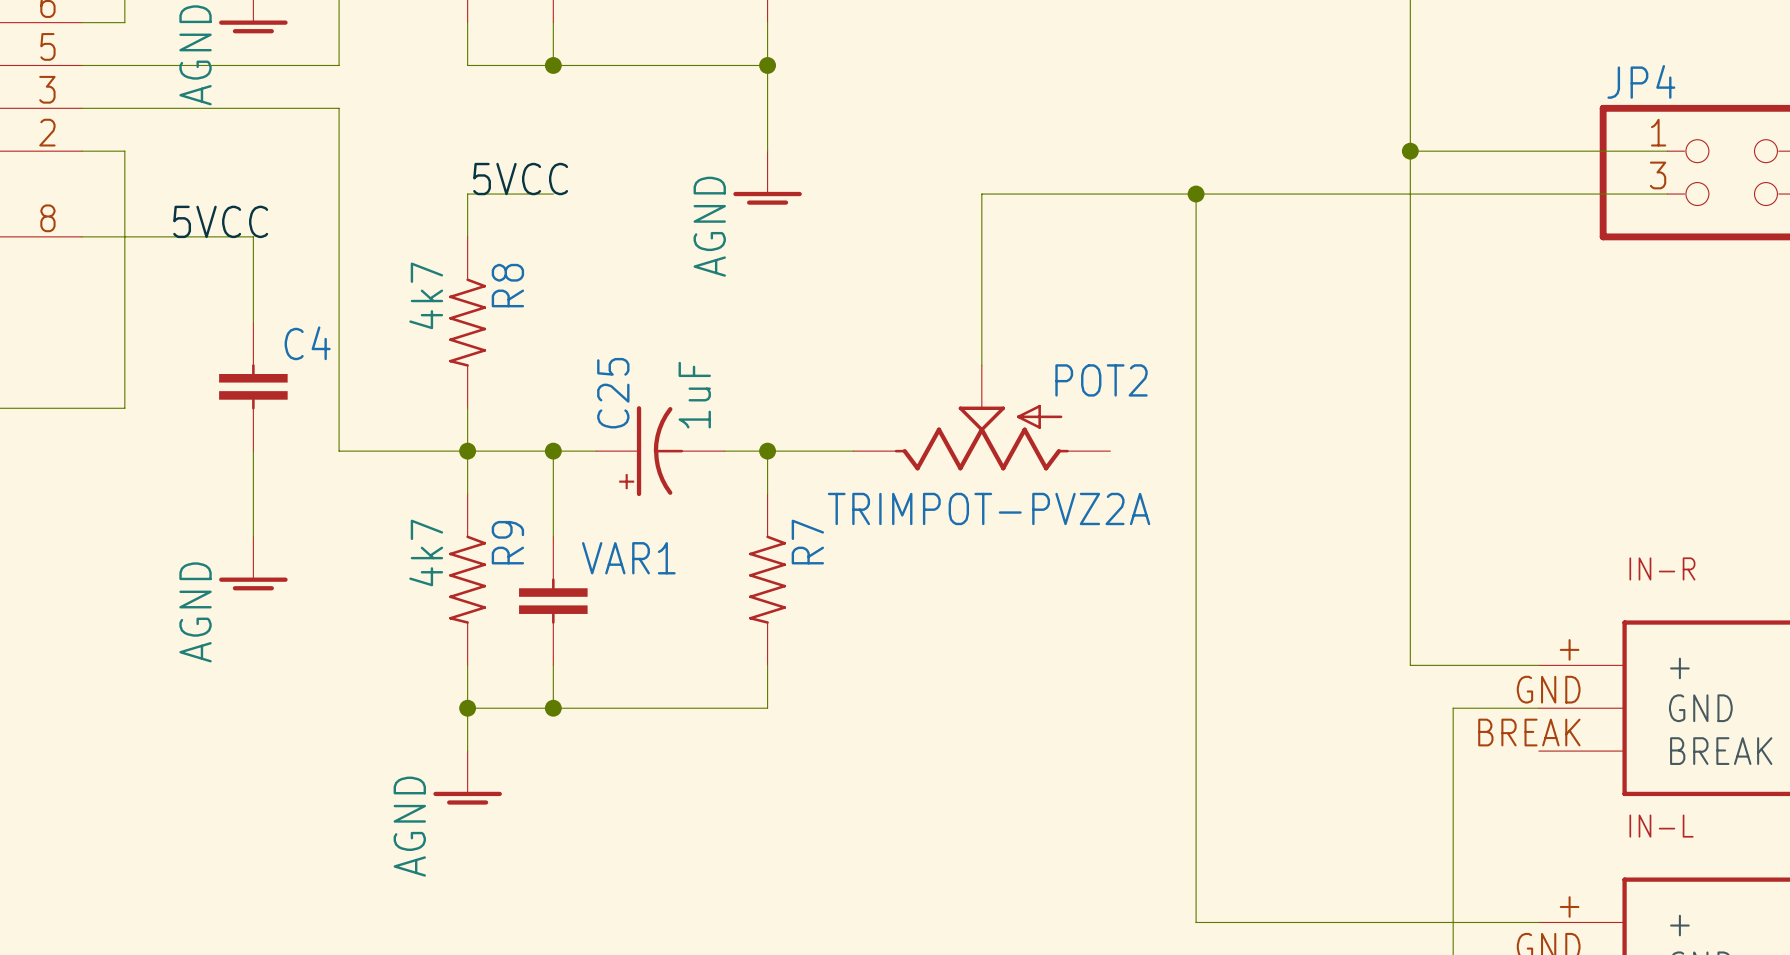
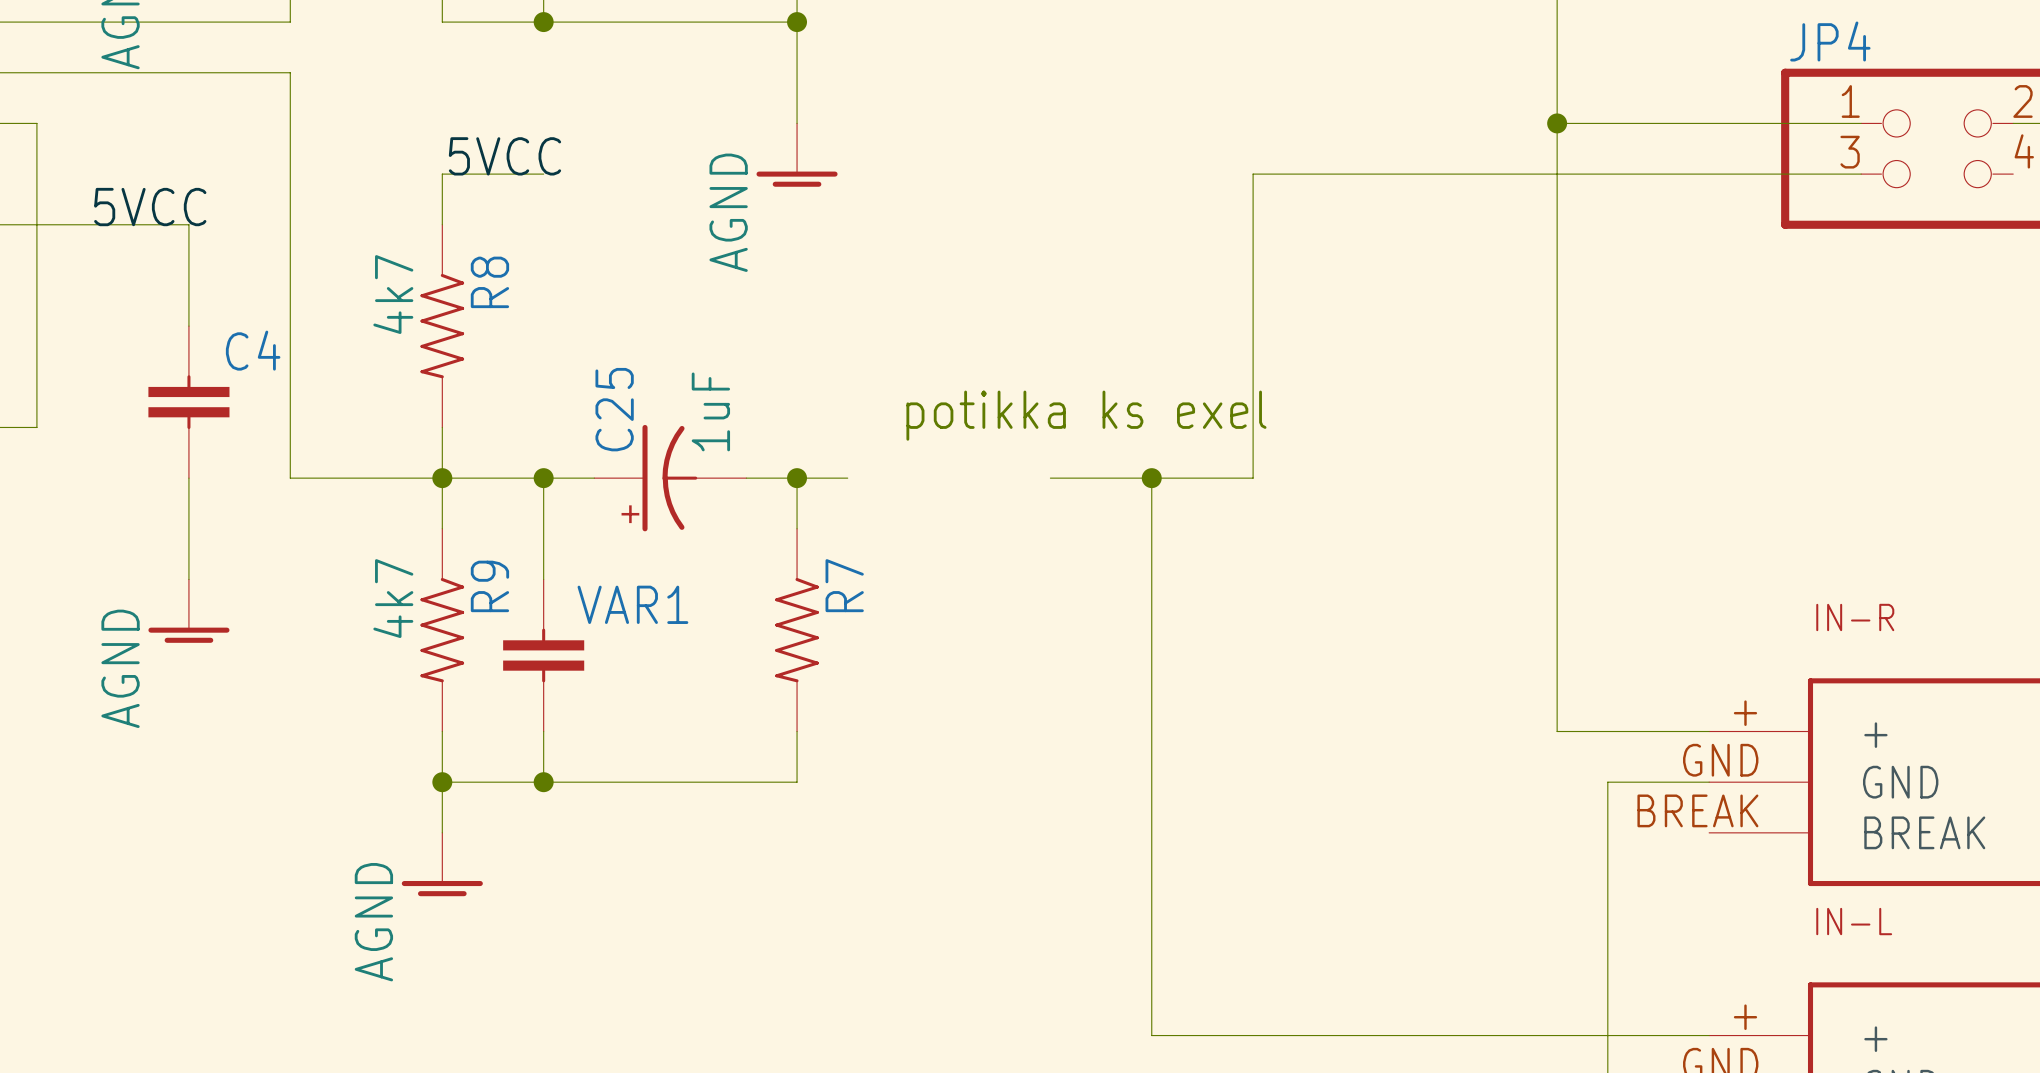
wire: (1153, 194) (981, 194) (981, 365) -> (1253, 174) (1253, 478) (1050, 478)
wire: (1196, 194) (1196, 922) -> (1151, 478) (1151, 1035) (1303, 1035)
junction: (1196, 194) -> none
text: none -> potikka ks exel (1086, 415)
POT2: TRIMPOT-PVZ2A (981, 417) -> none
wire: (810, 451) (853, 451) -> none
junction: none -> (1151, 478)

